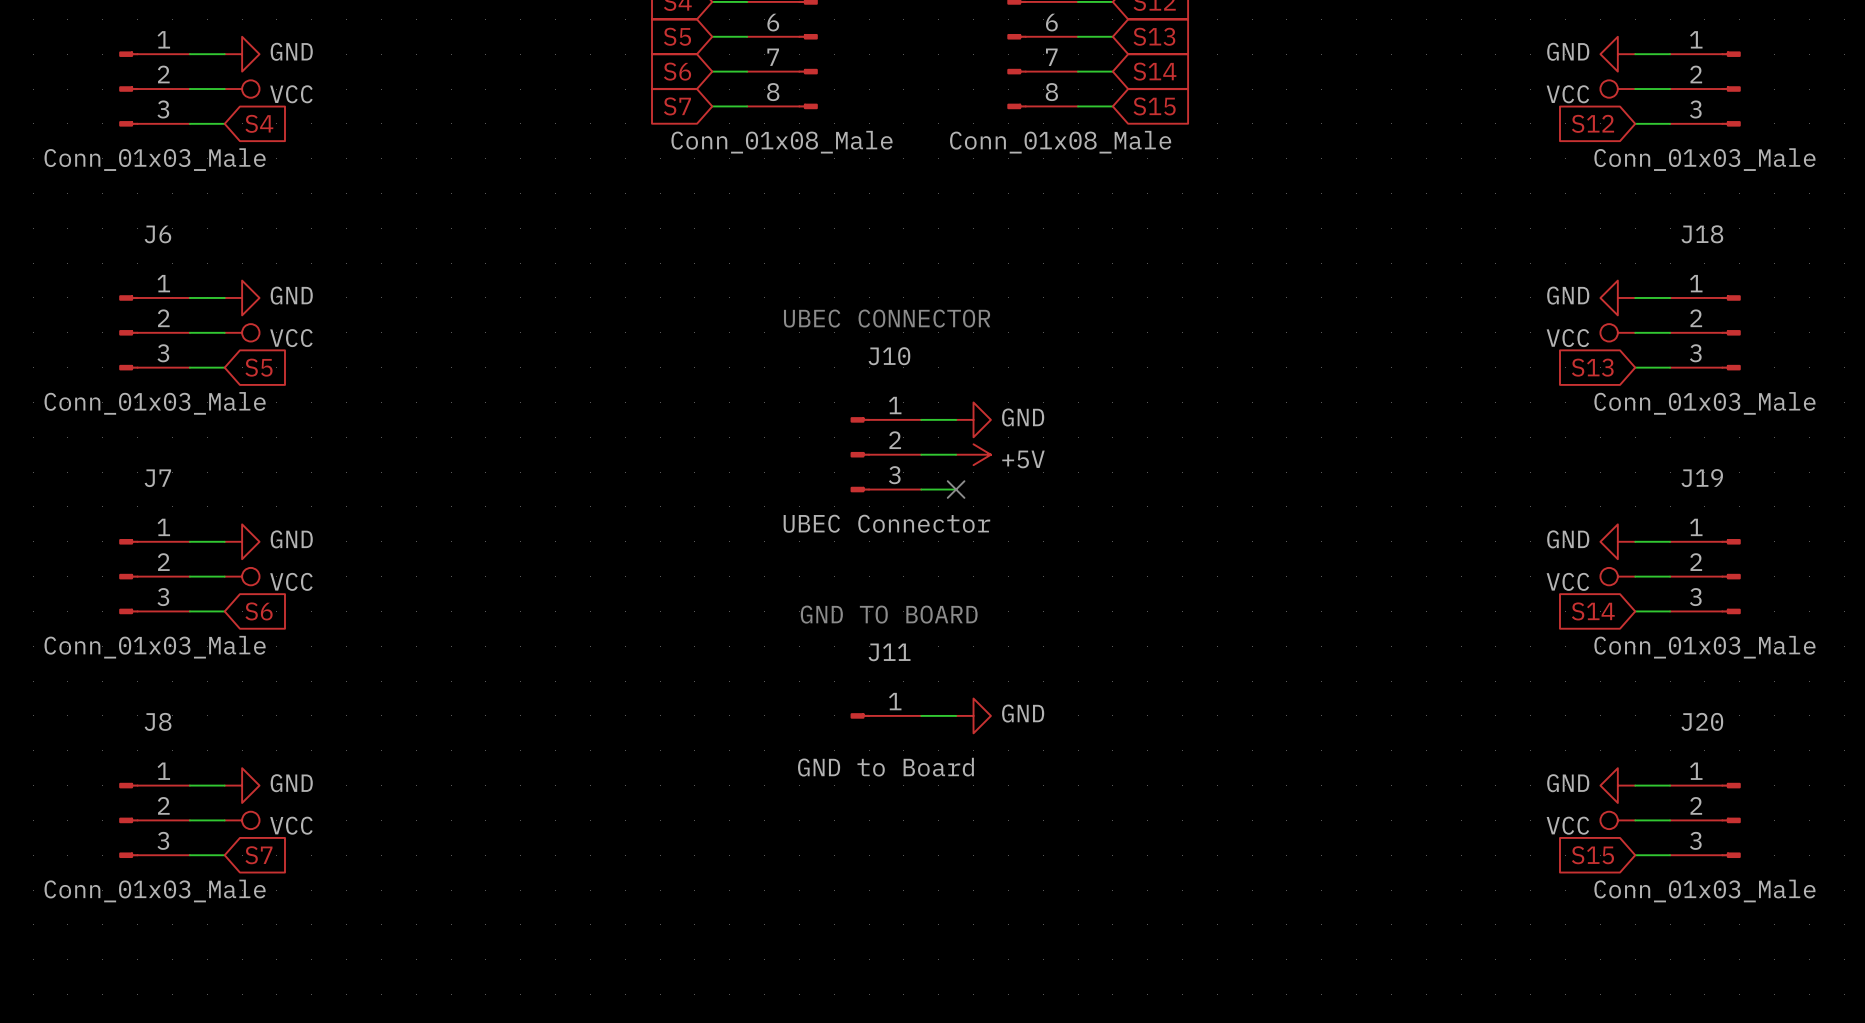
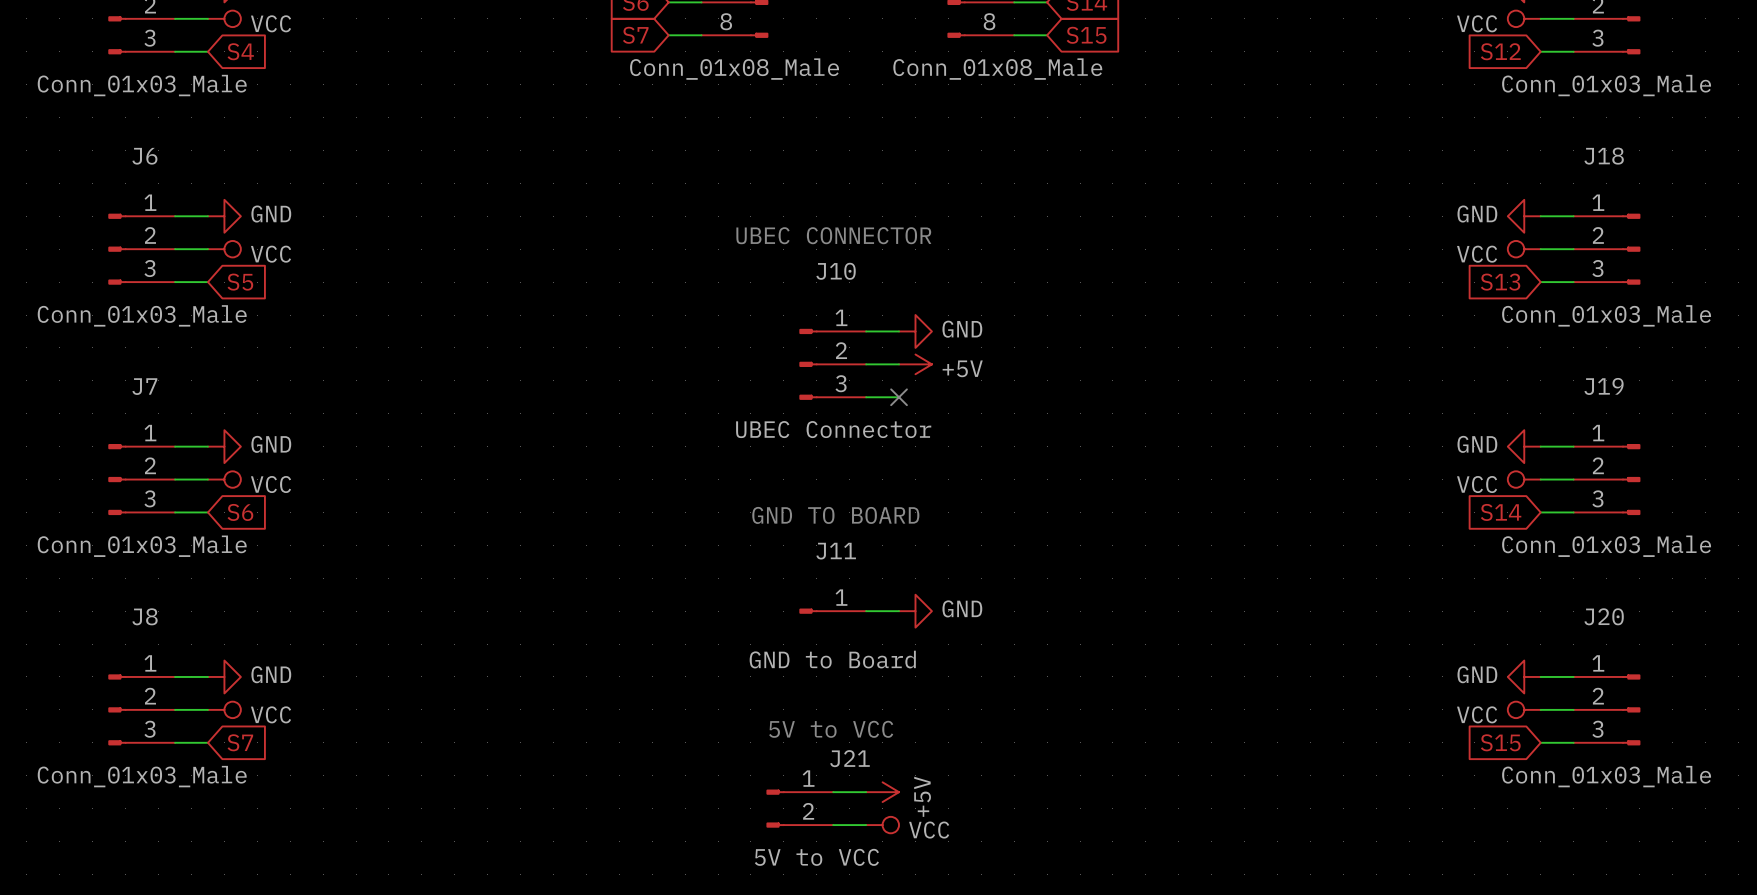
text: none -> 5V to VCC (831, 729)
wire: none -> (833, 792) (866, 792)
power symbol: none -> +5V (882, 792)
J21: none -> 5V to VCC (799, 808)
wire: none -> (833, 825) (866, 825)
power symbol: none -> VCC (882, 825)

